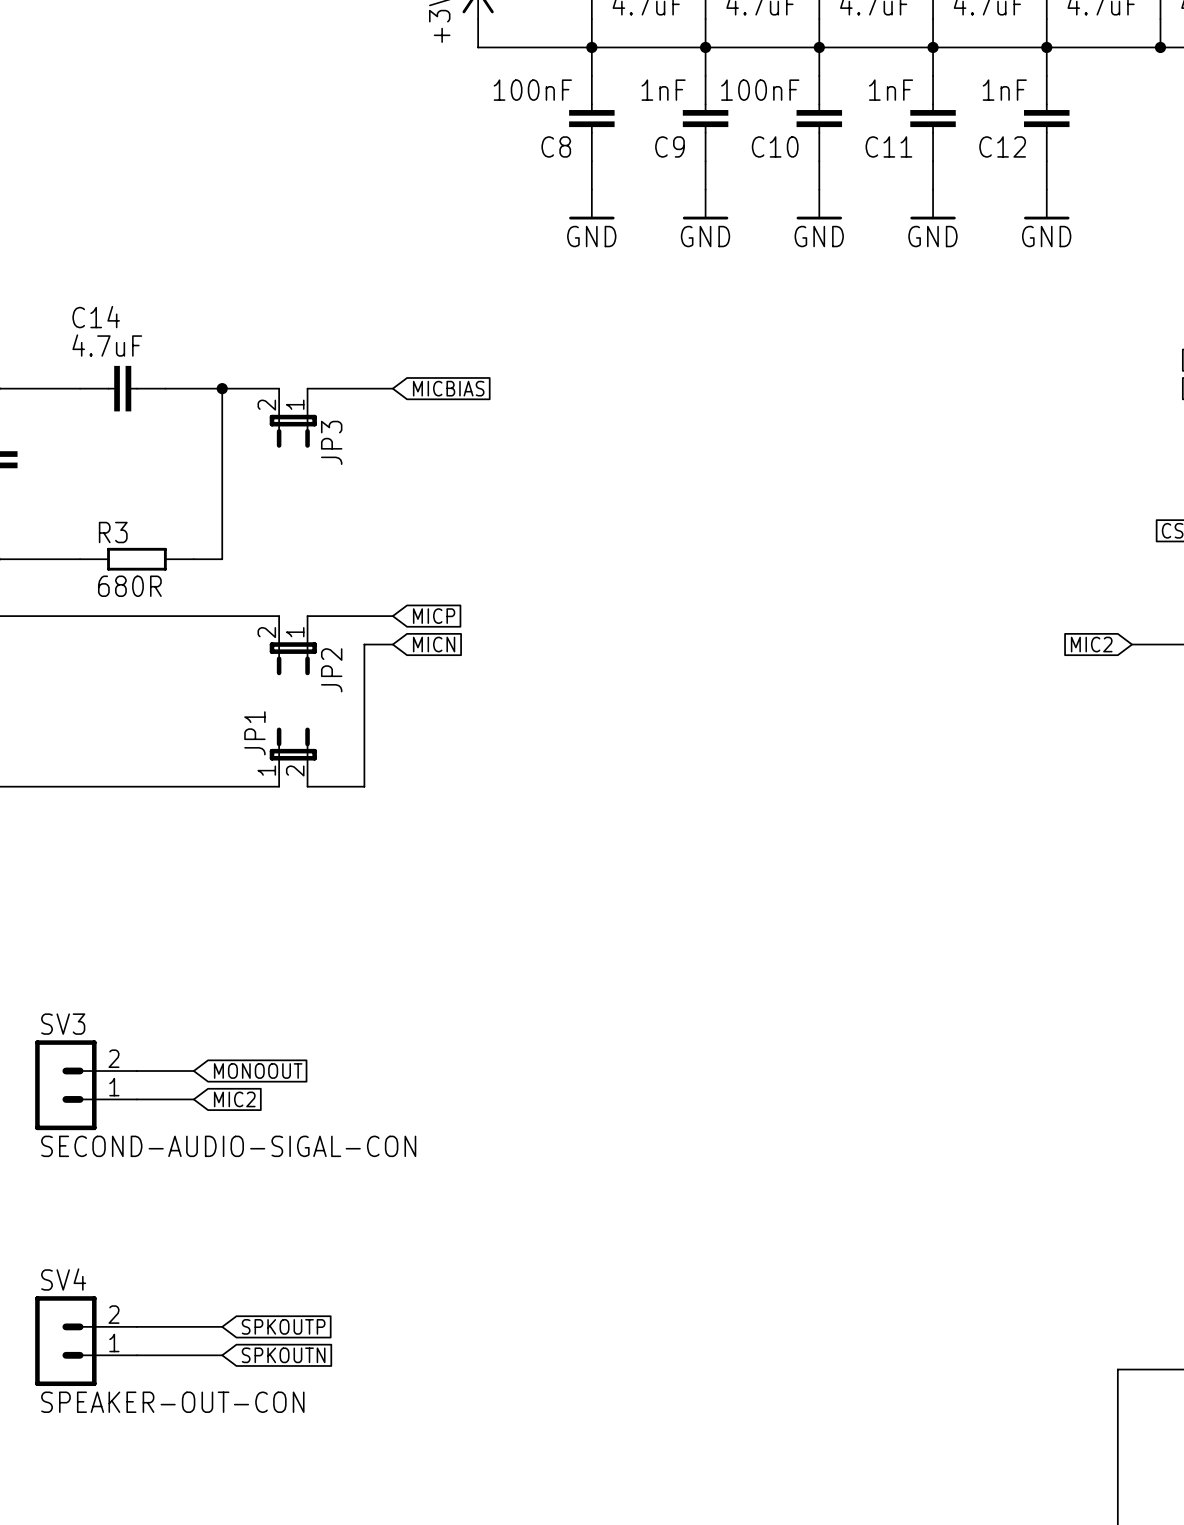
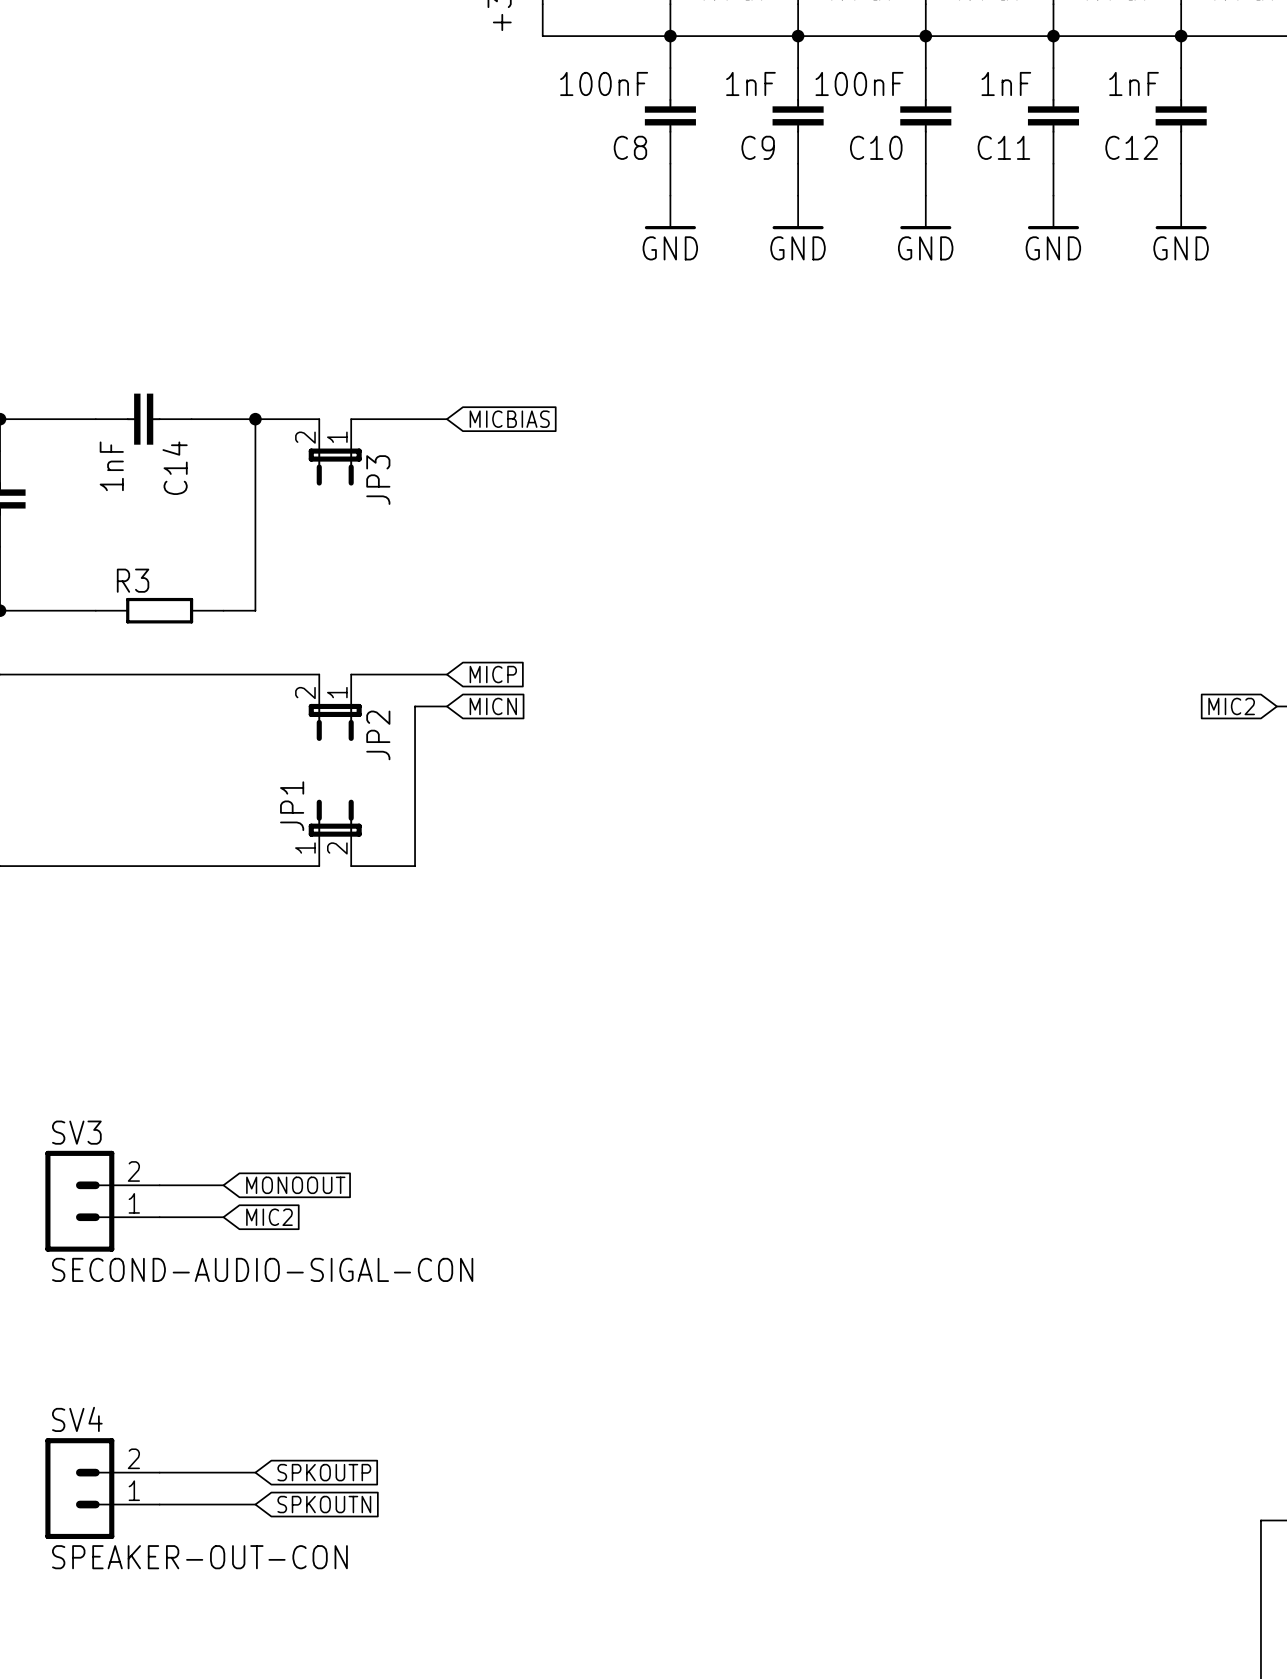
C14 name rotation: 0° (96, 317) -> 90° counterclockwise (175, 468)
C14 name position: C14 (96, 317) -> C14 (175, 468)
C14 value: 4.7uF (107, 345) -> 1nF (111, 466)
R3 value: 680R (129, 586) -> none

